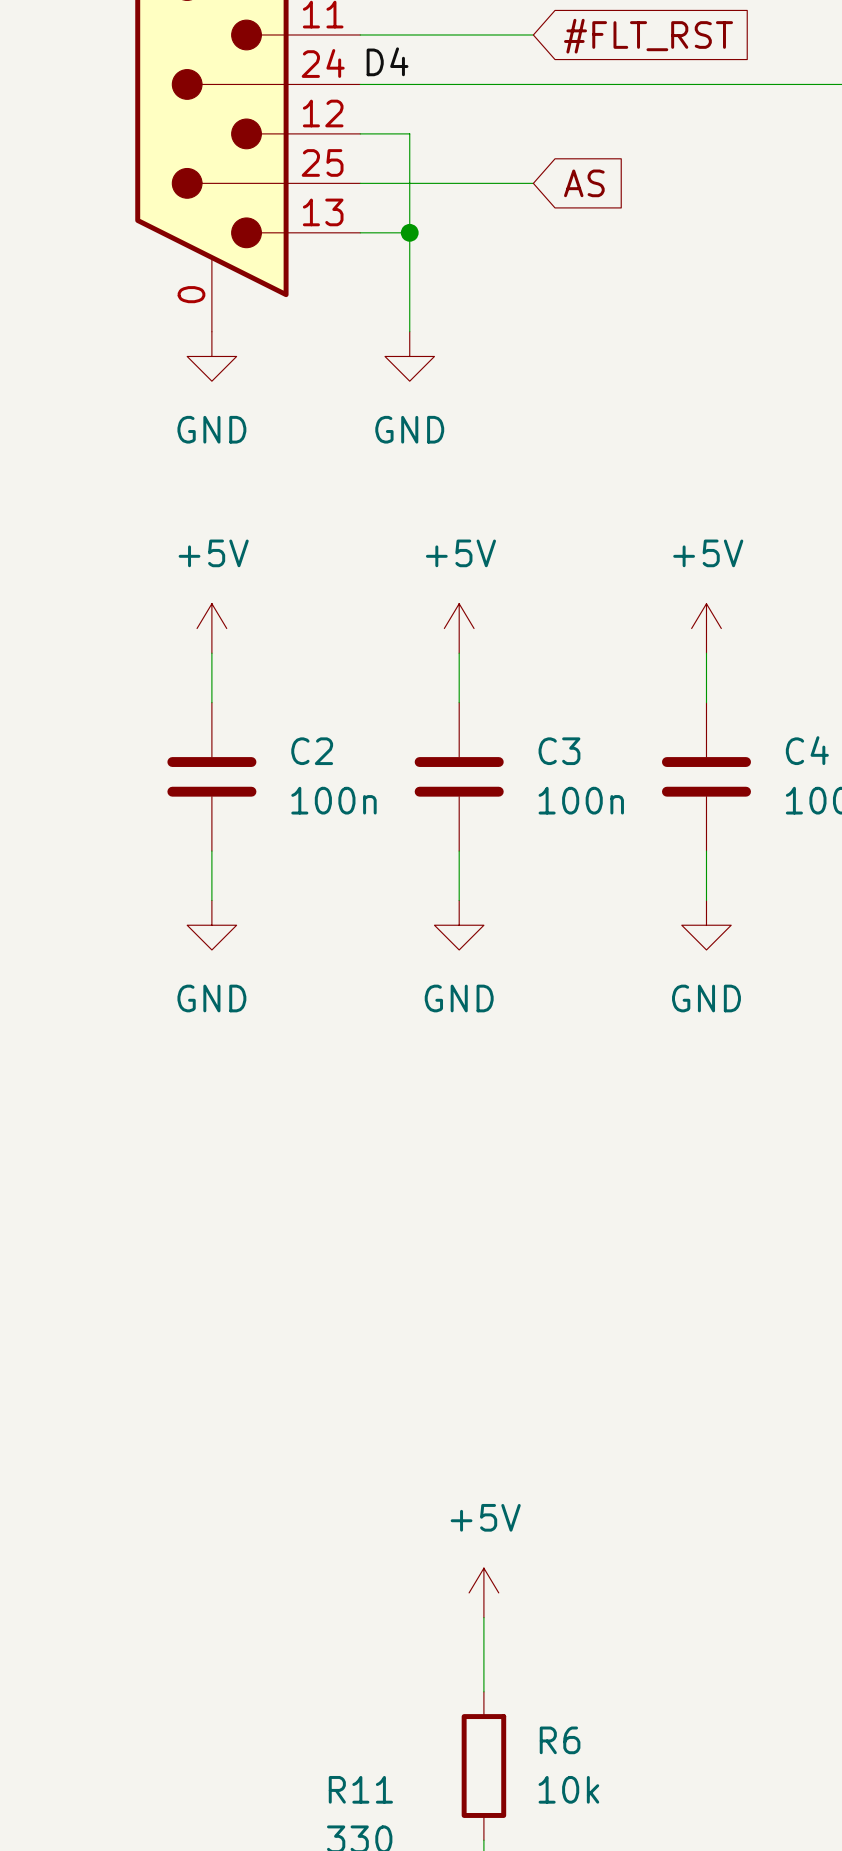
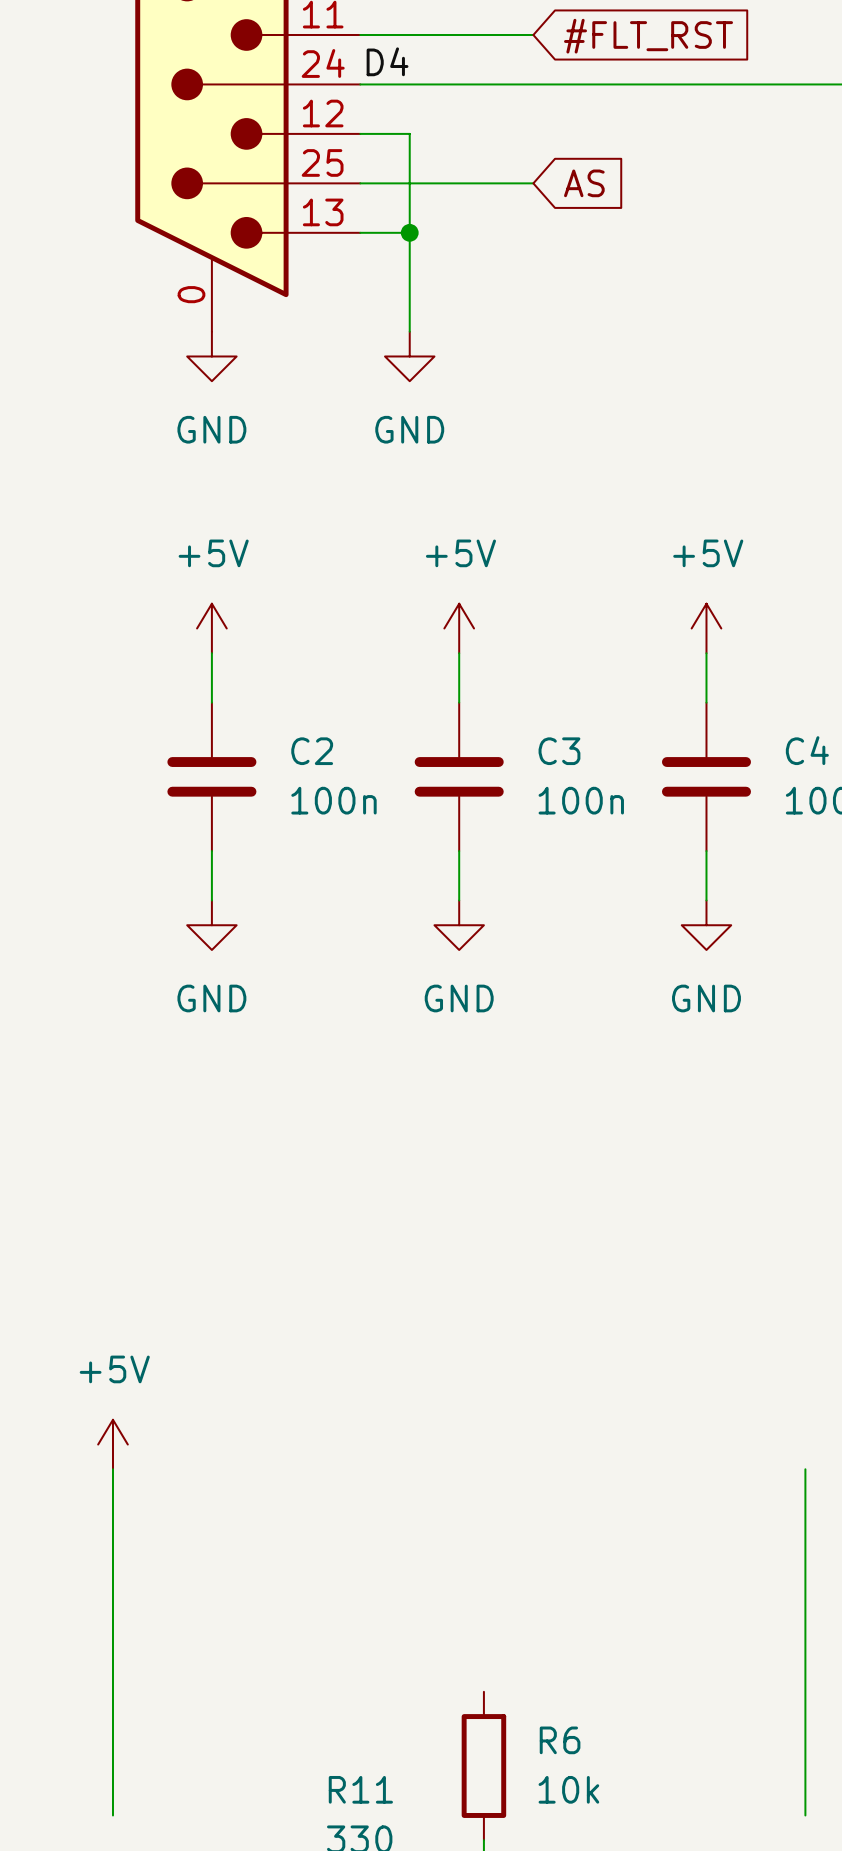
wire: none -> (112, 1469) (112, 1815)
wire: none -> (805, 1469) (805, 1815)
power symbol position: +5V (483, 1592) -> +5V (112, 1444)
wire: (483, 1617) (483, 1691) -> none

